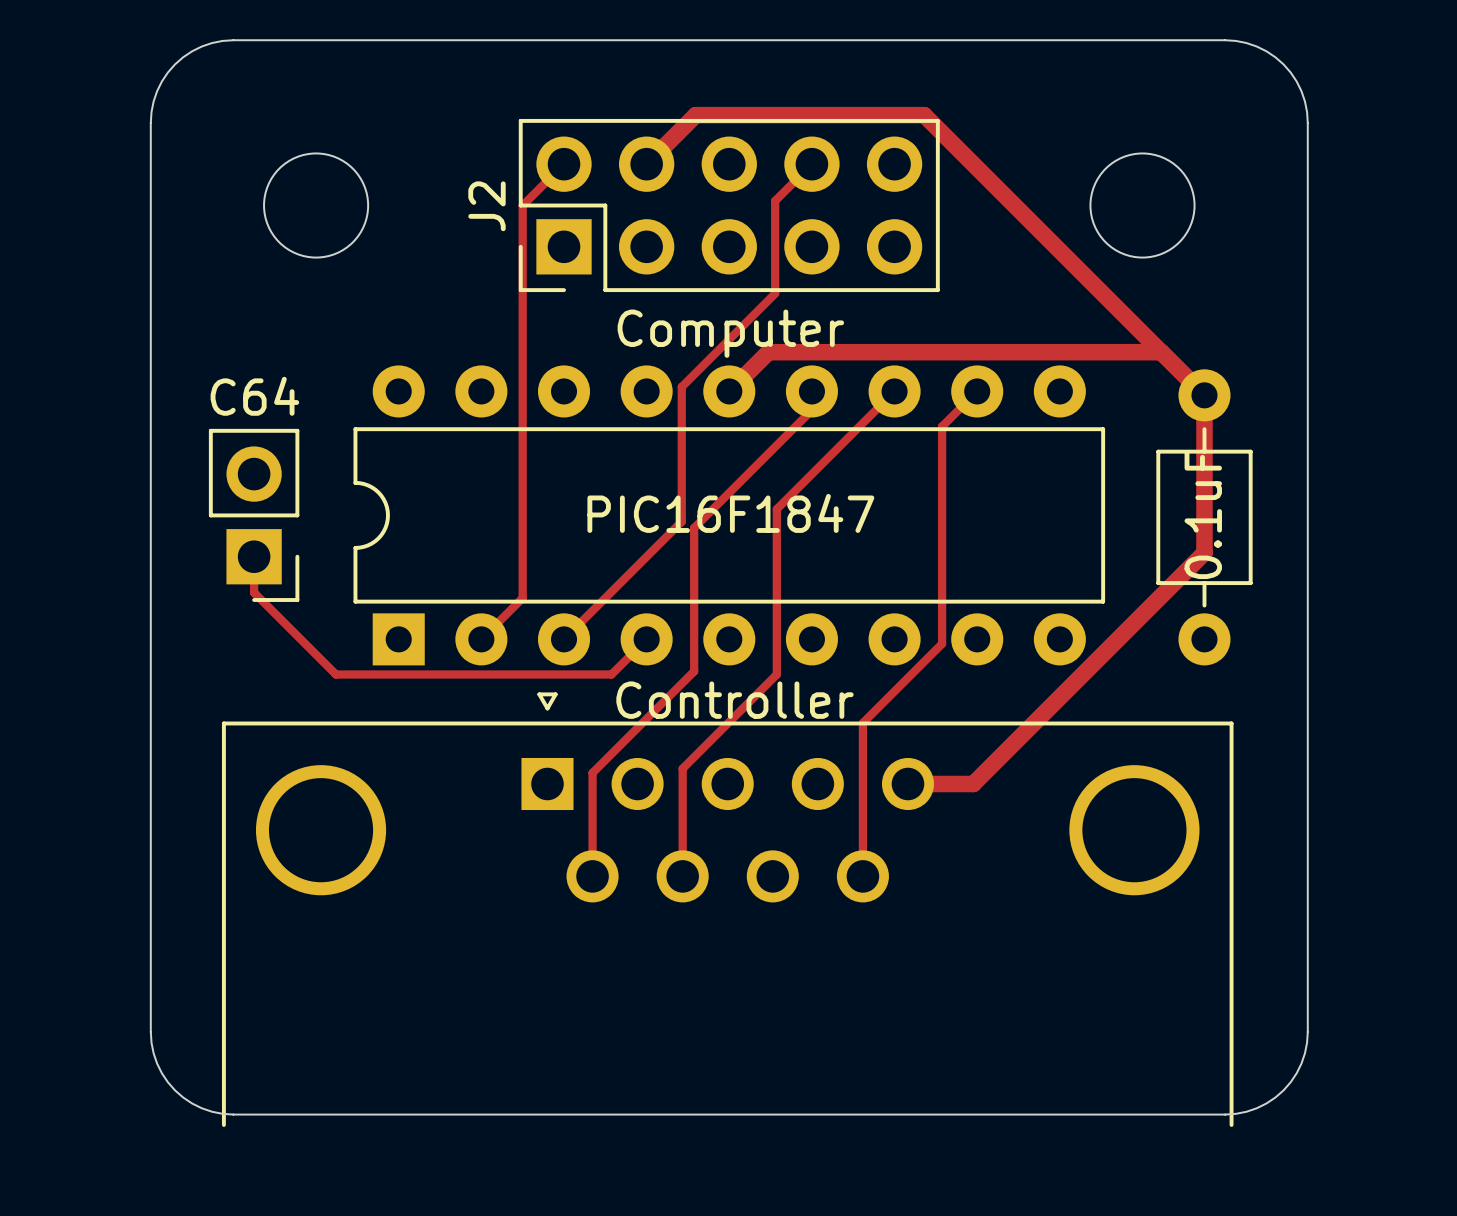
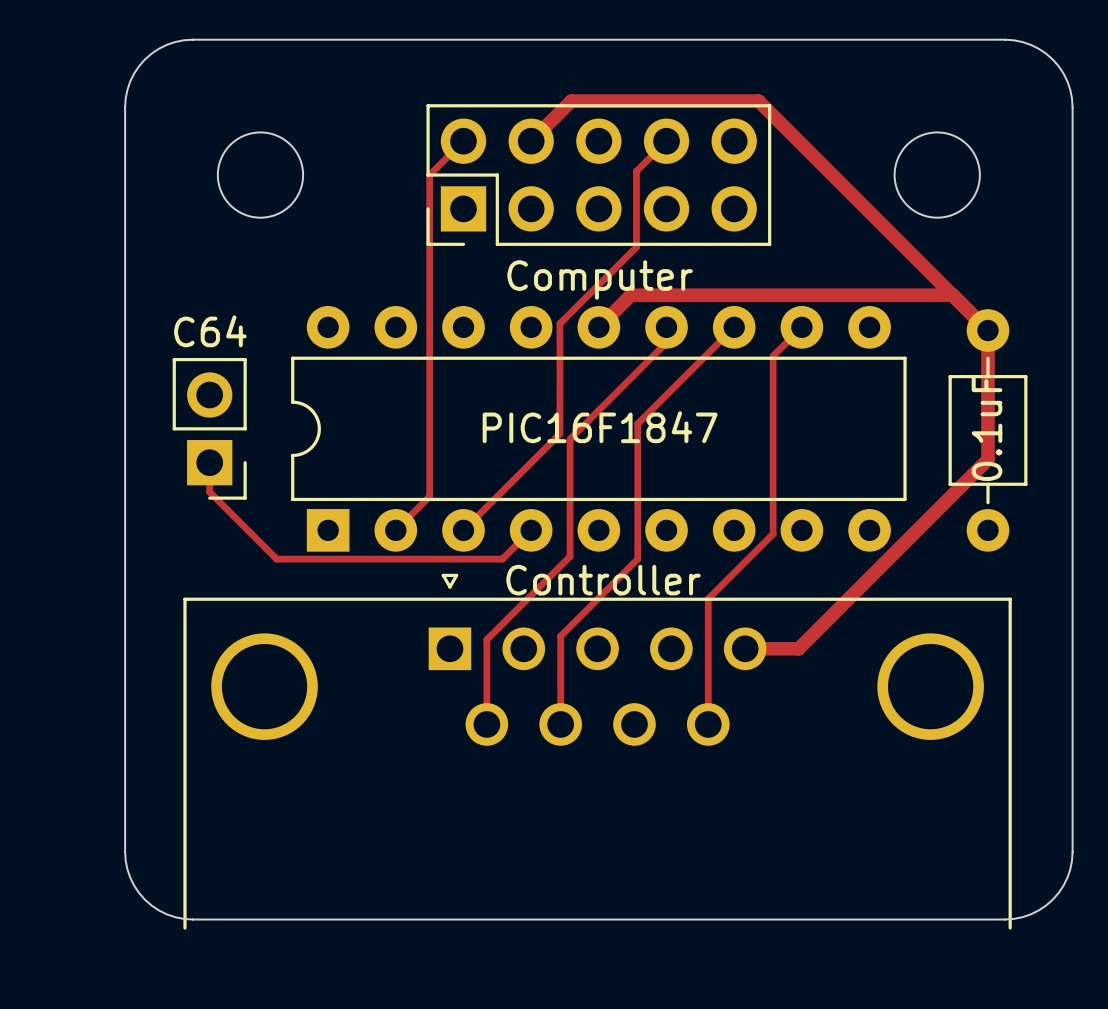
J2 name: J2 (486, 206) -> none

